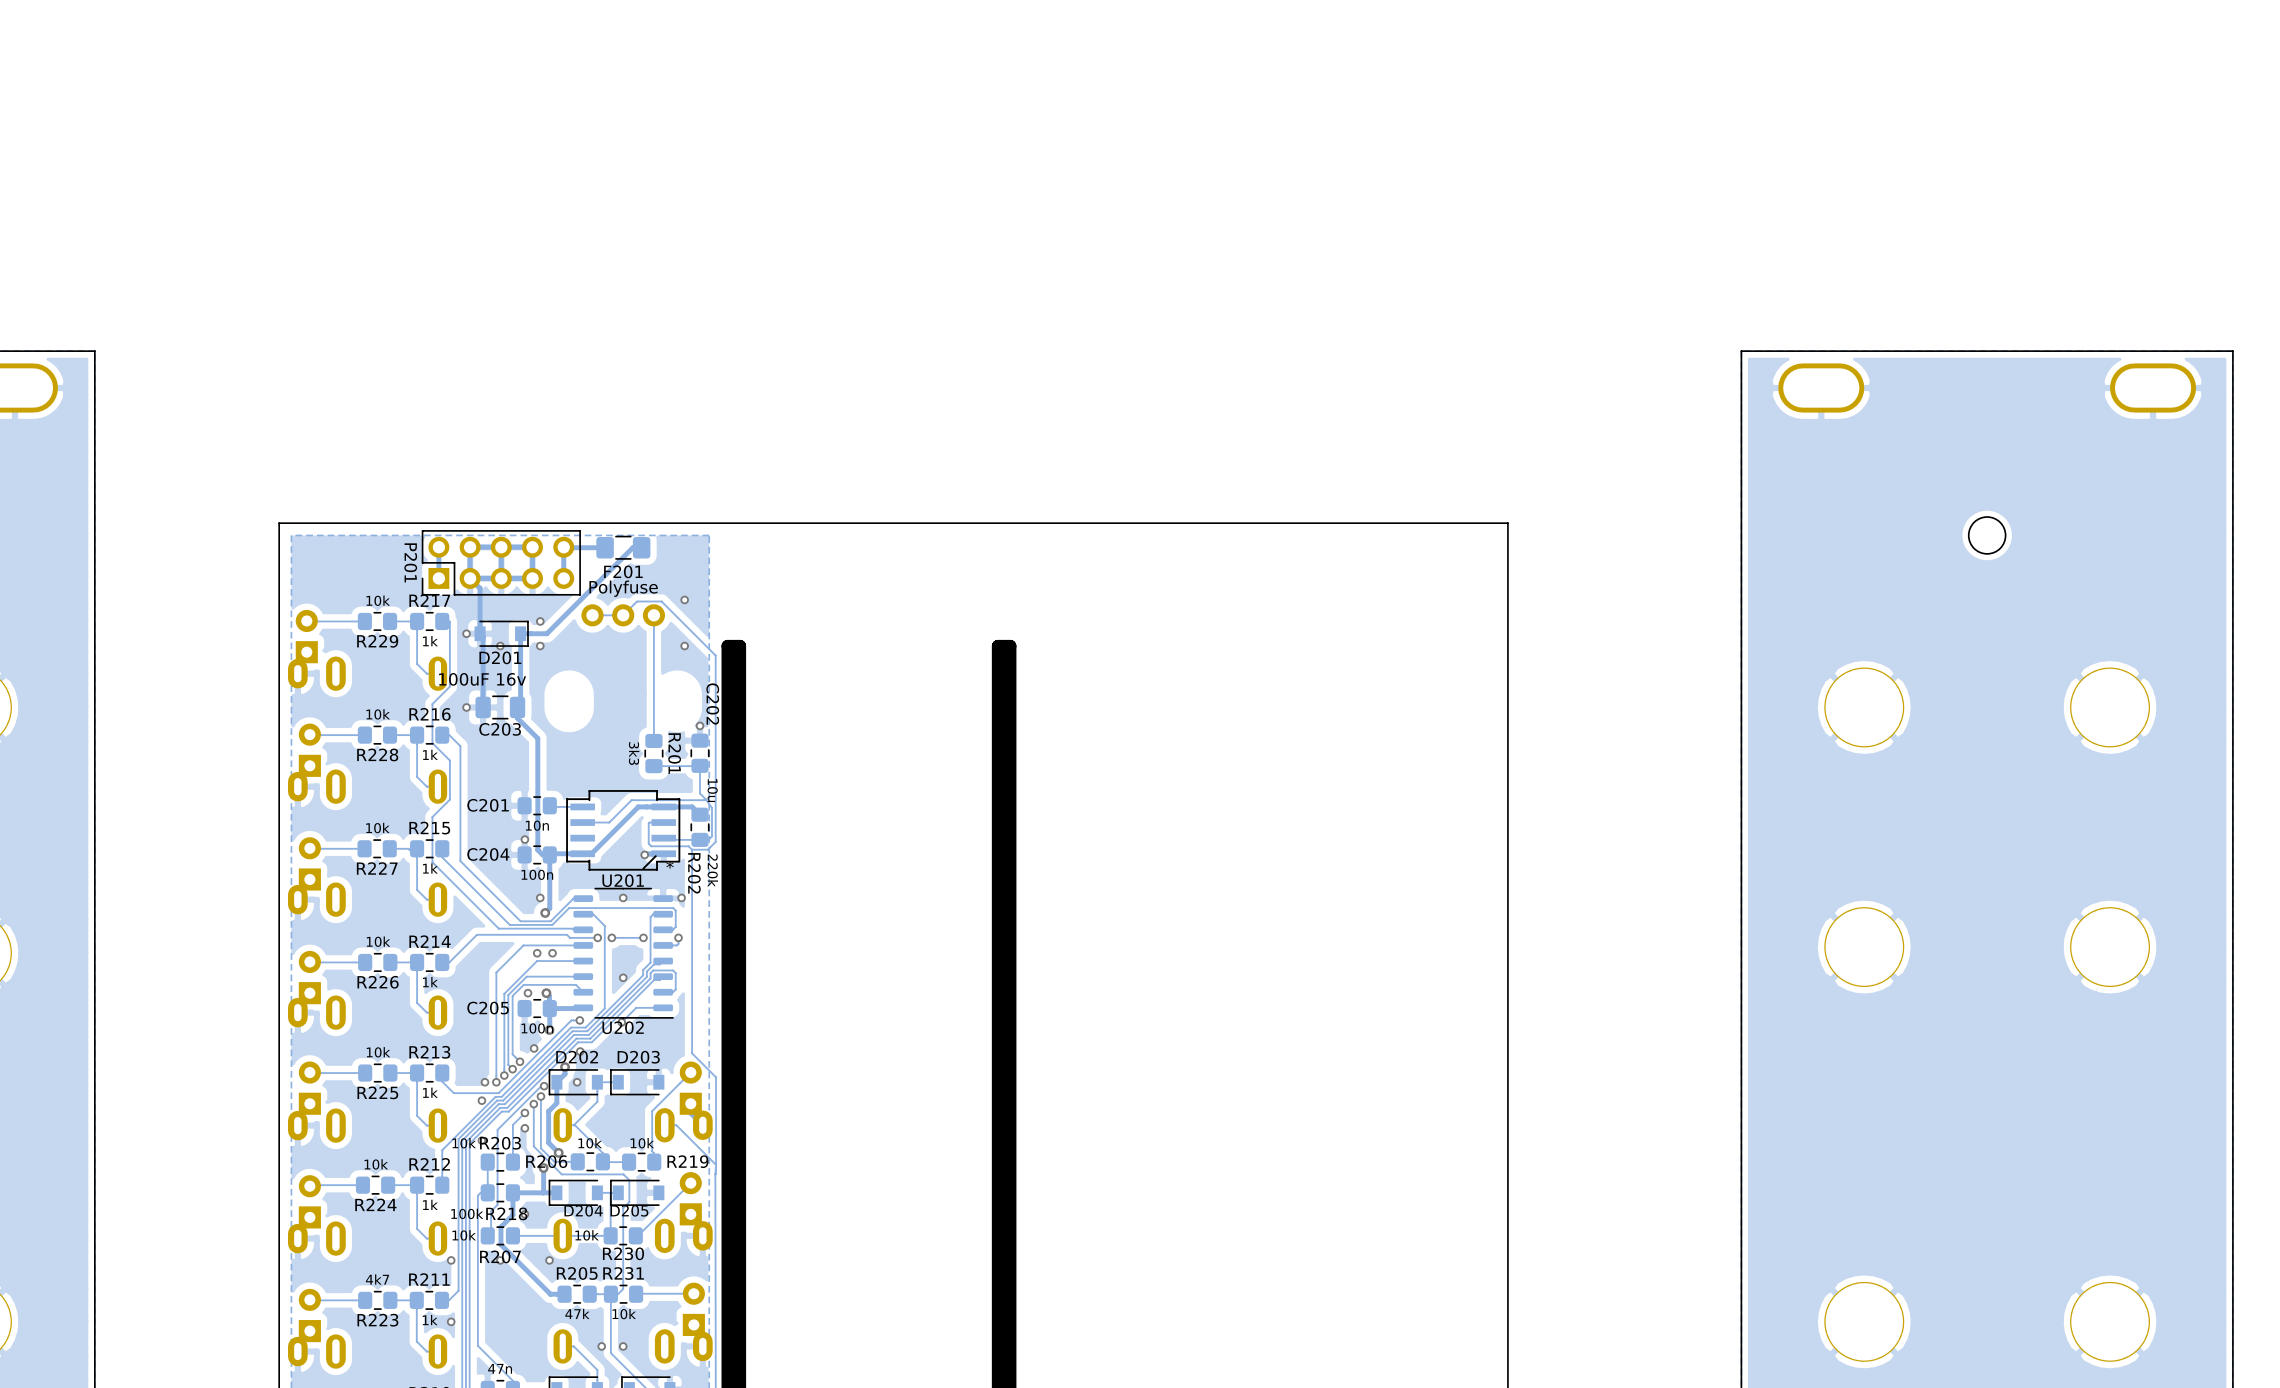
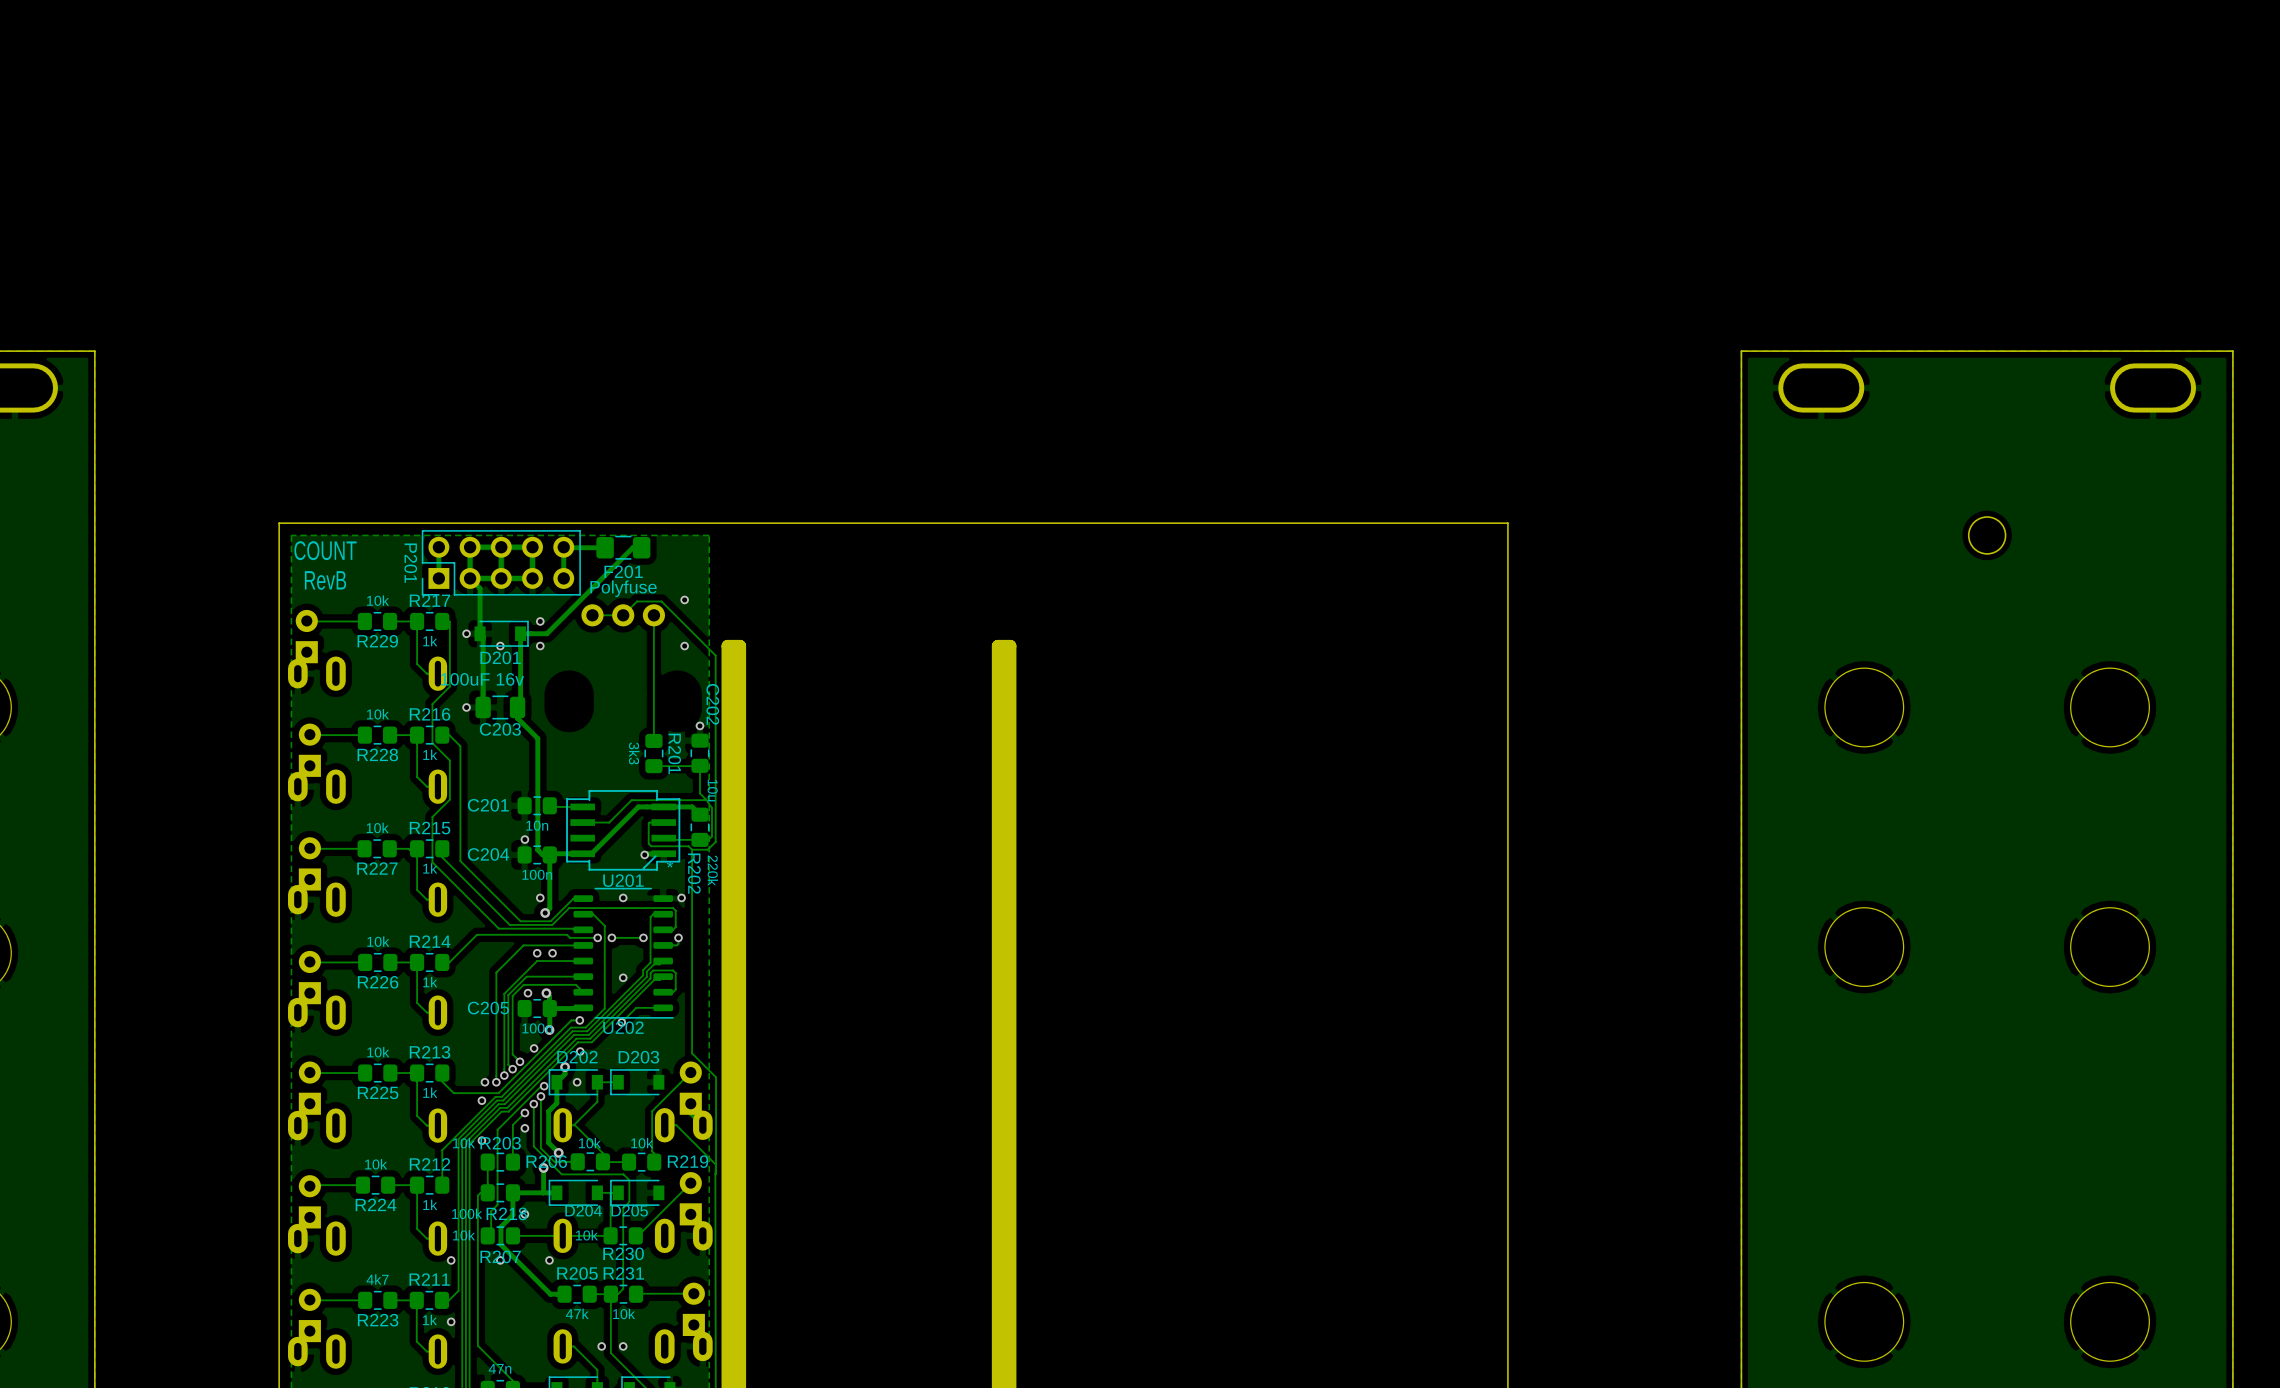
text: none -> COUNT (325, 550)
text: none -> RevB (325, 580)

